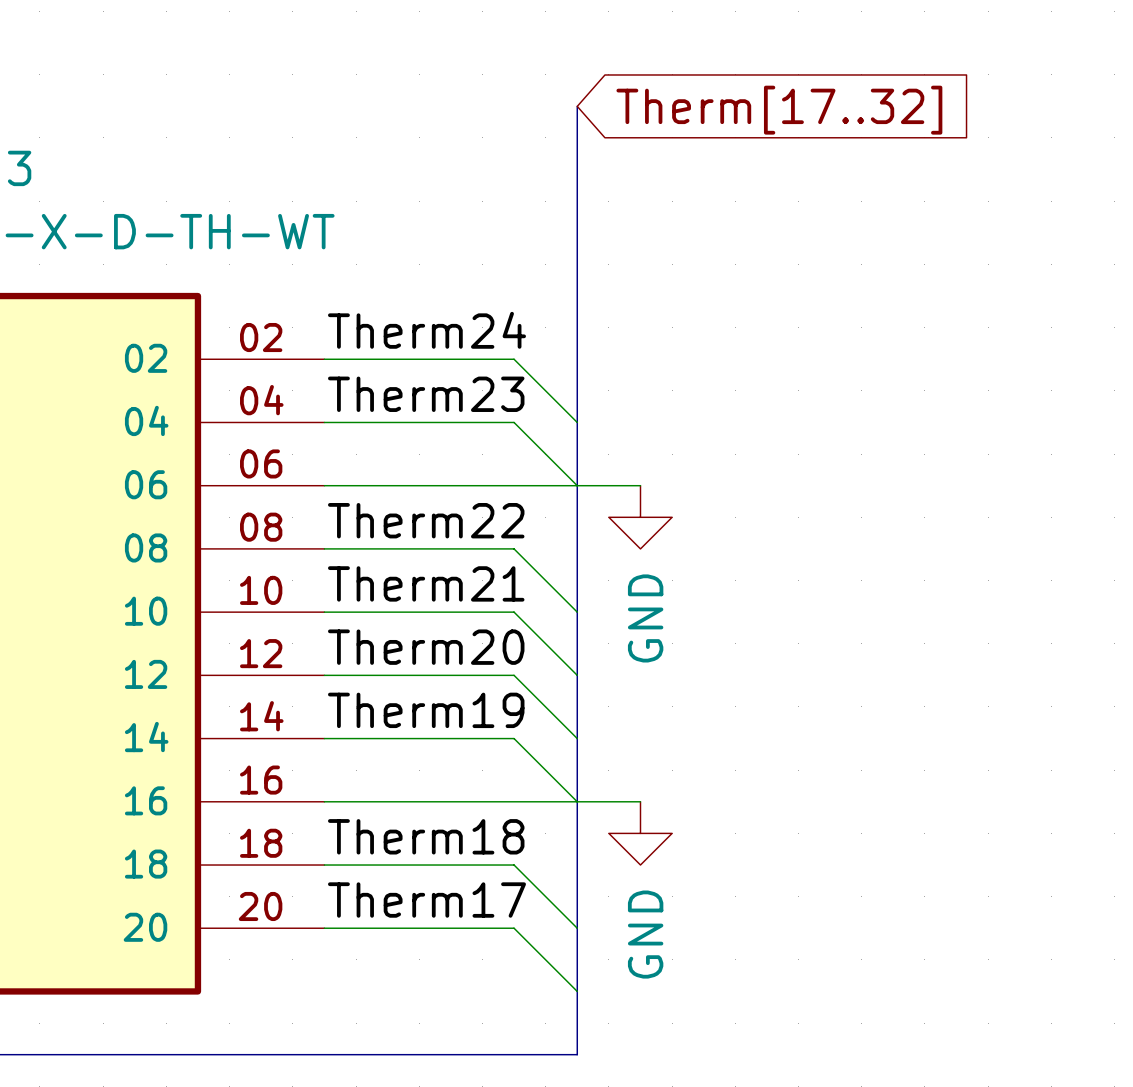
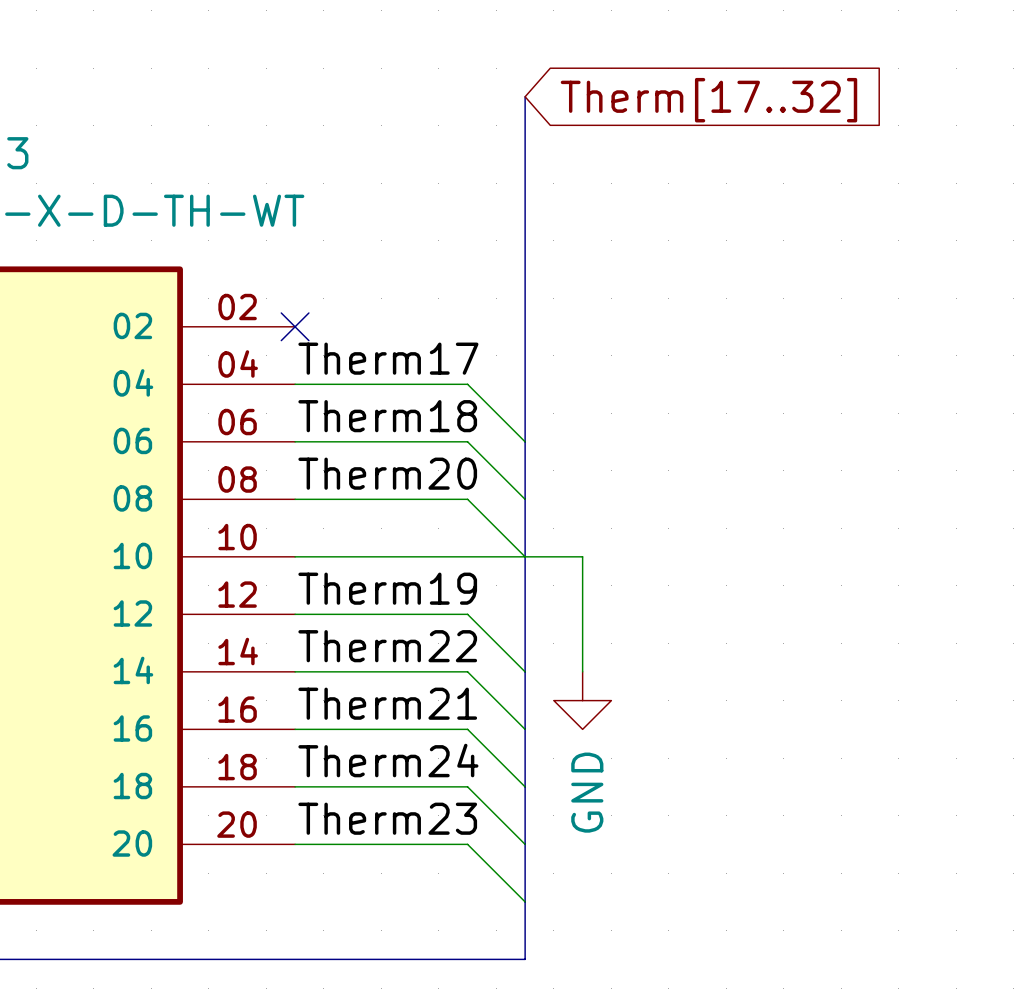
label: Therm24 (426, 330) -> none
wire: (324, 359) (514, 359) (577, 422) -> none
no-connect mark: none -> (295, 326)
label: Therm23 (426, 394) -> Therm17 (388, 358)
label: none -> Therm18 (387, 416)
wire: (514, 485) (640, 485) -> (467, 441) (525, 499)
power symbol: GND (640, 517) -> none
label: Therm22 (426, 520) -> Therm20 (387, 473)
label position: Therm21 (426, 583) -> Therm21 (387, 703)
wire: (514, 612) (577, 675) -> (467, 556) (582, 556) (582, 671)
label: Therm20 (426, 647) -> Therm19 (387, 588)
label: Therm19 (426, 710) -> Therm22 (387, 646)
wire: (514, 801) (640, 801) -> (467, 729) (525, 786)
power symbol position: GND (640, 833) -> GND (582, 700)
label: Therm18 (426, 836) -> Therm24 (388, 760)
label: Therm17 (426, 900) -> Therm23 (387, 818)

